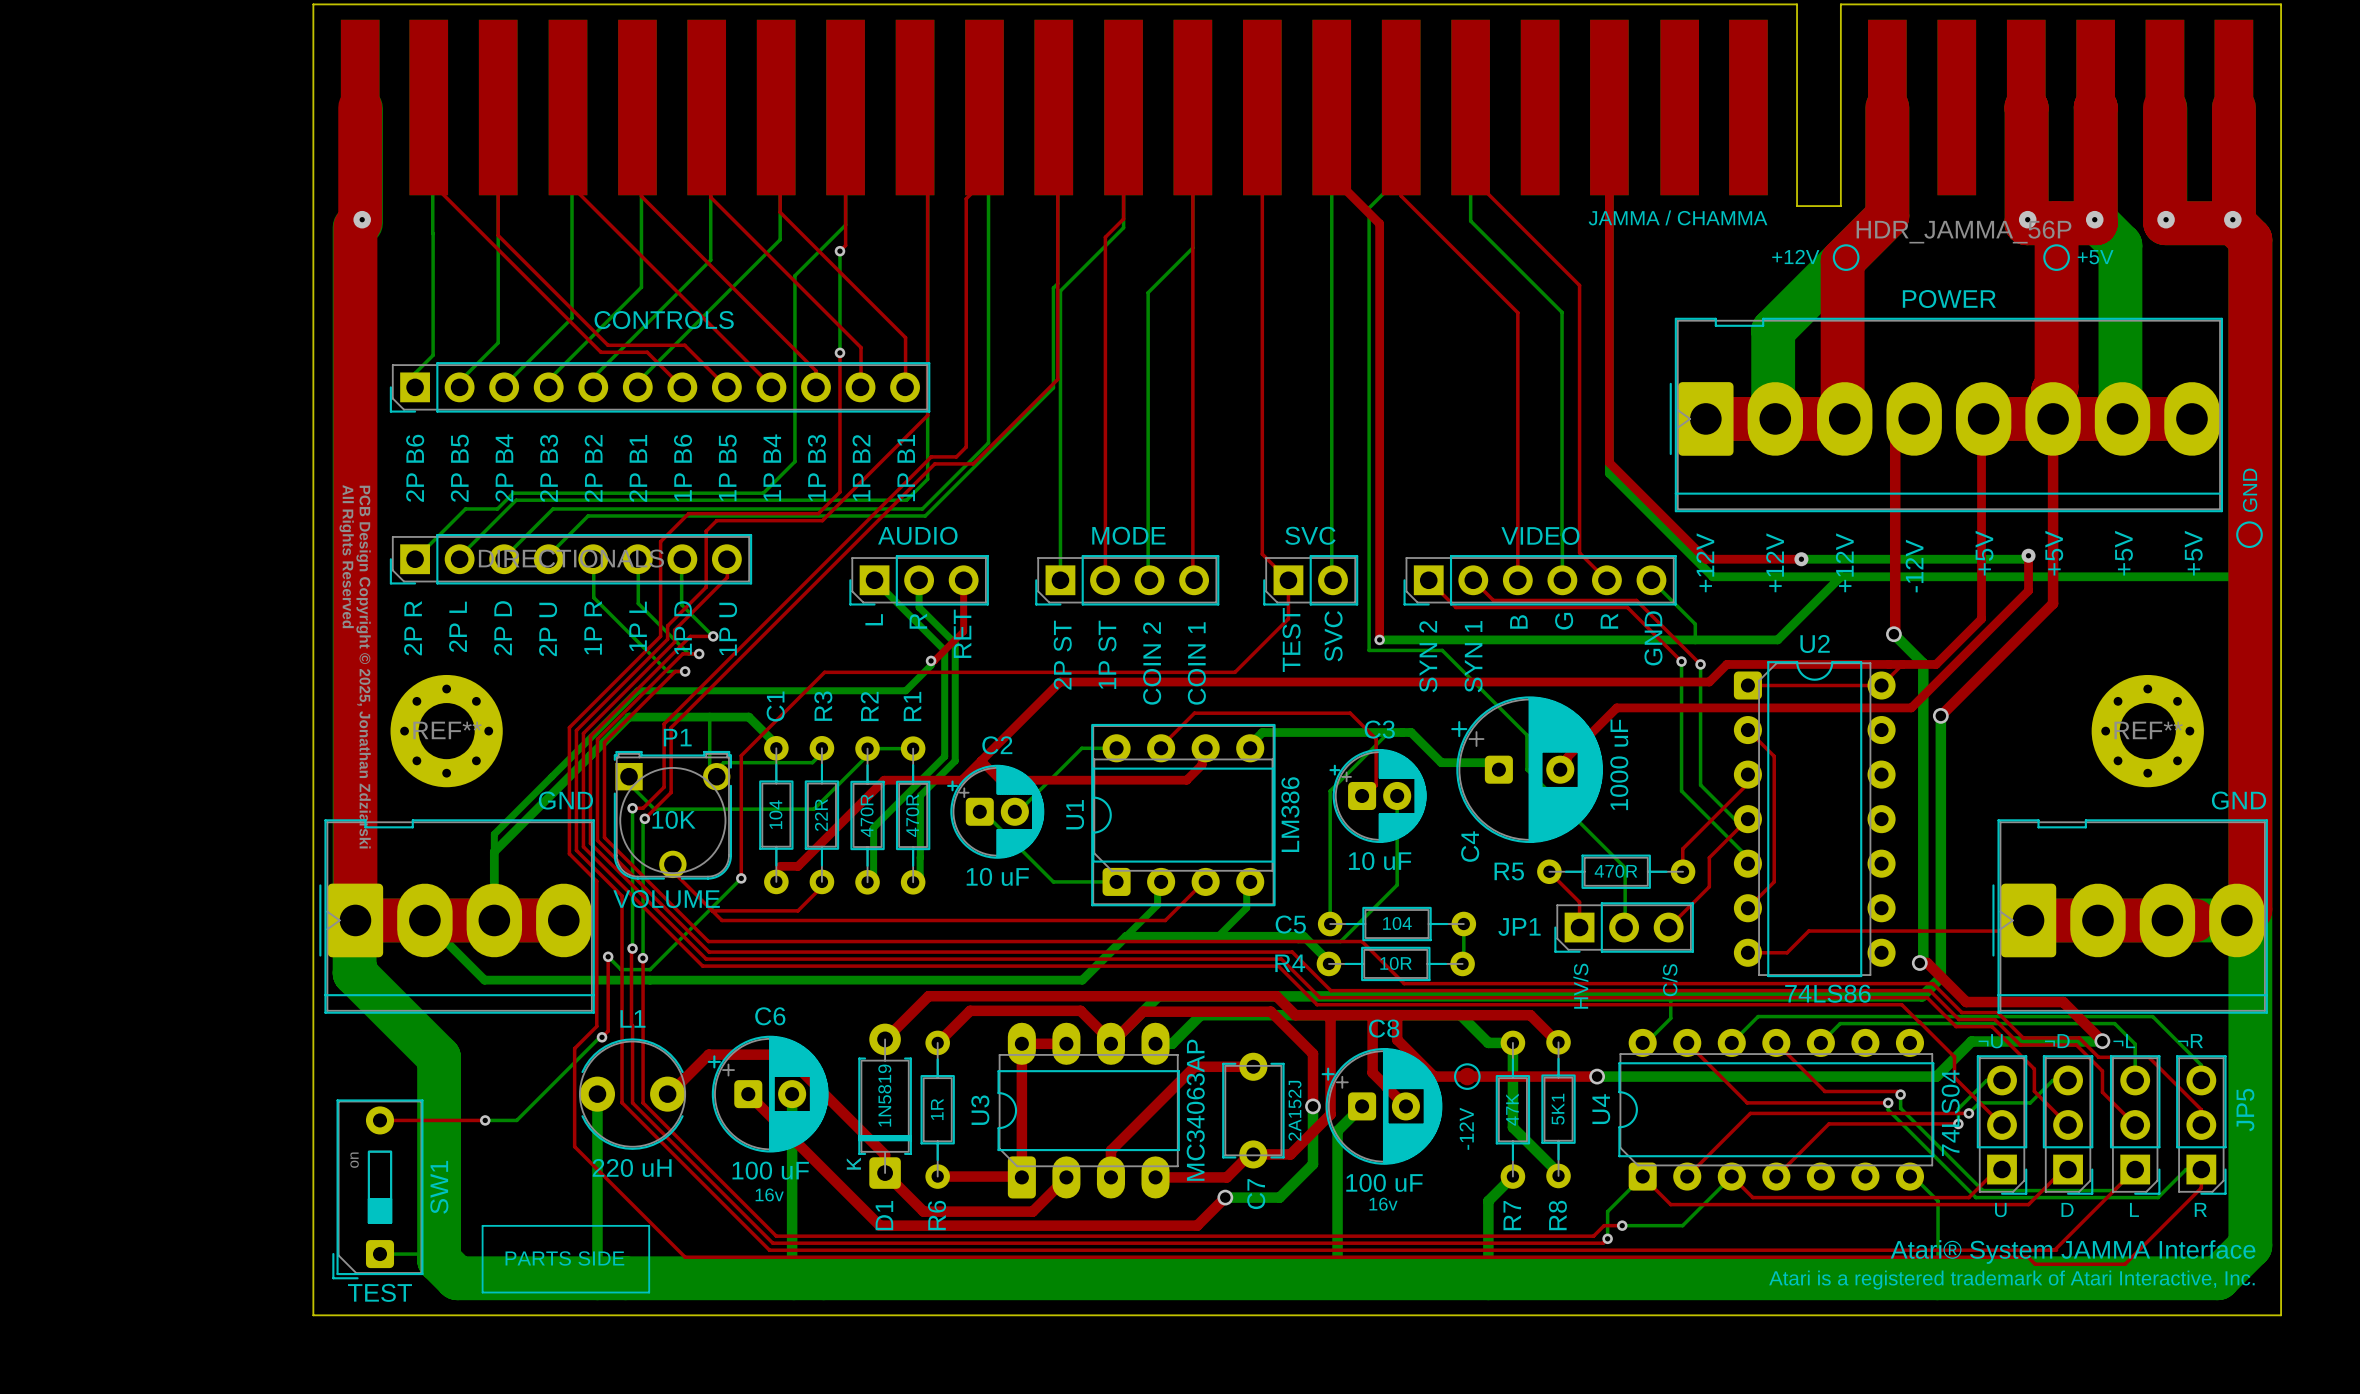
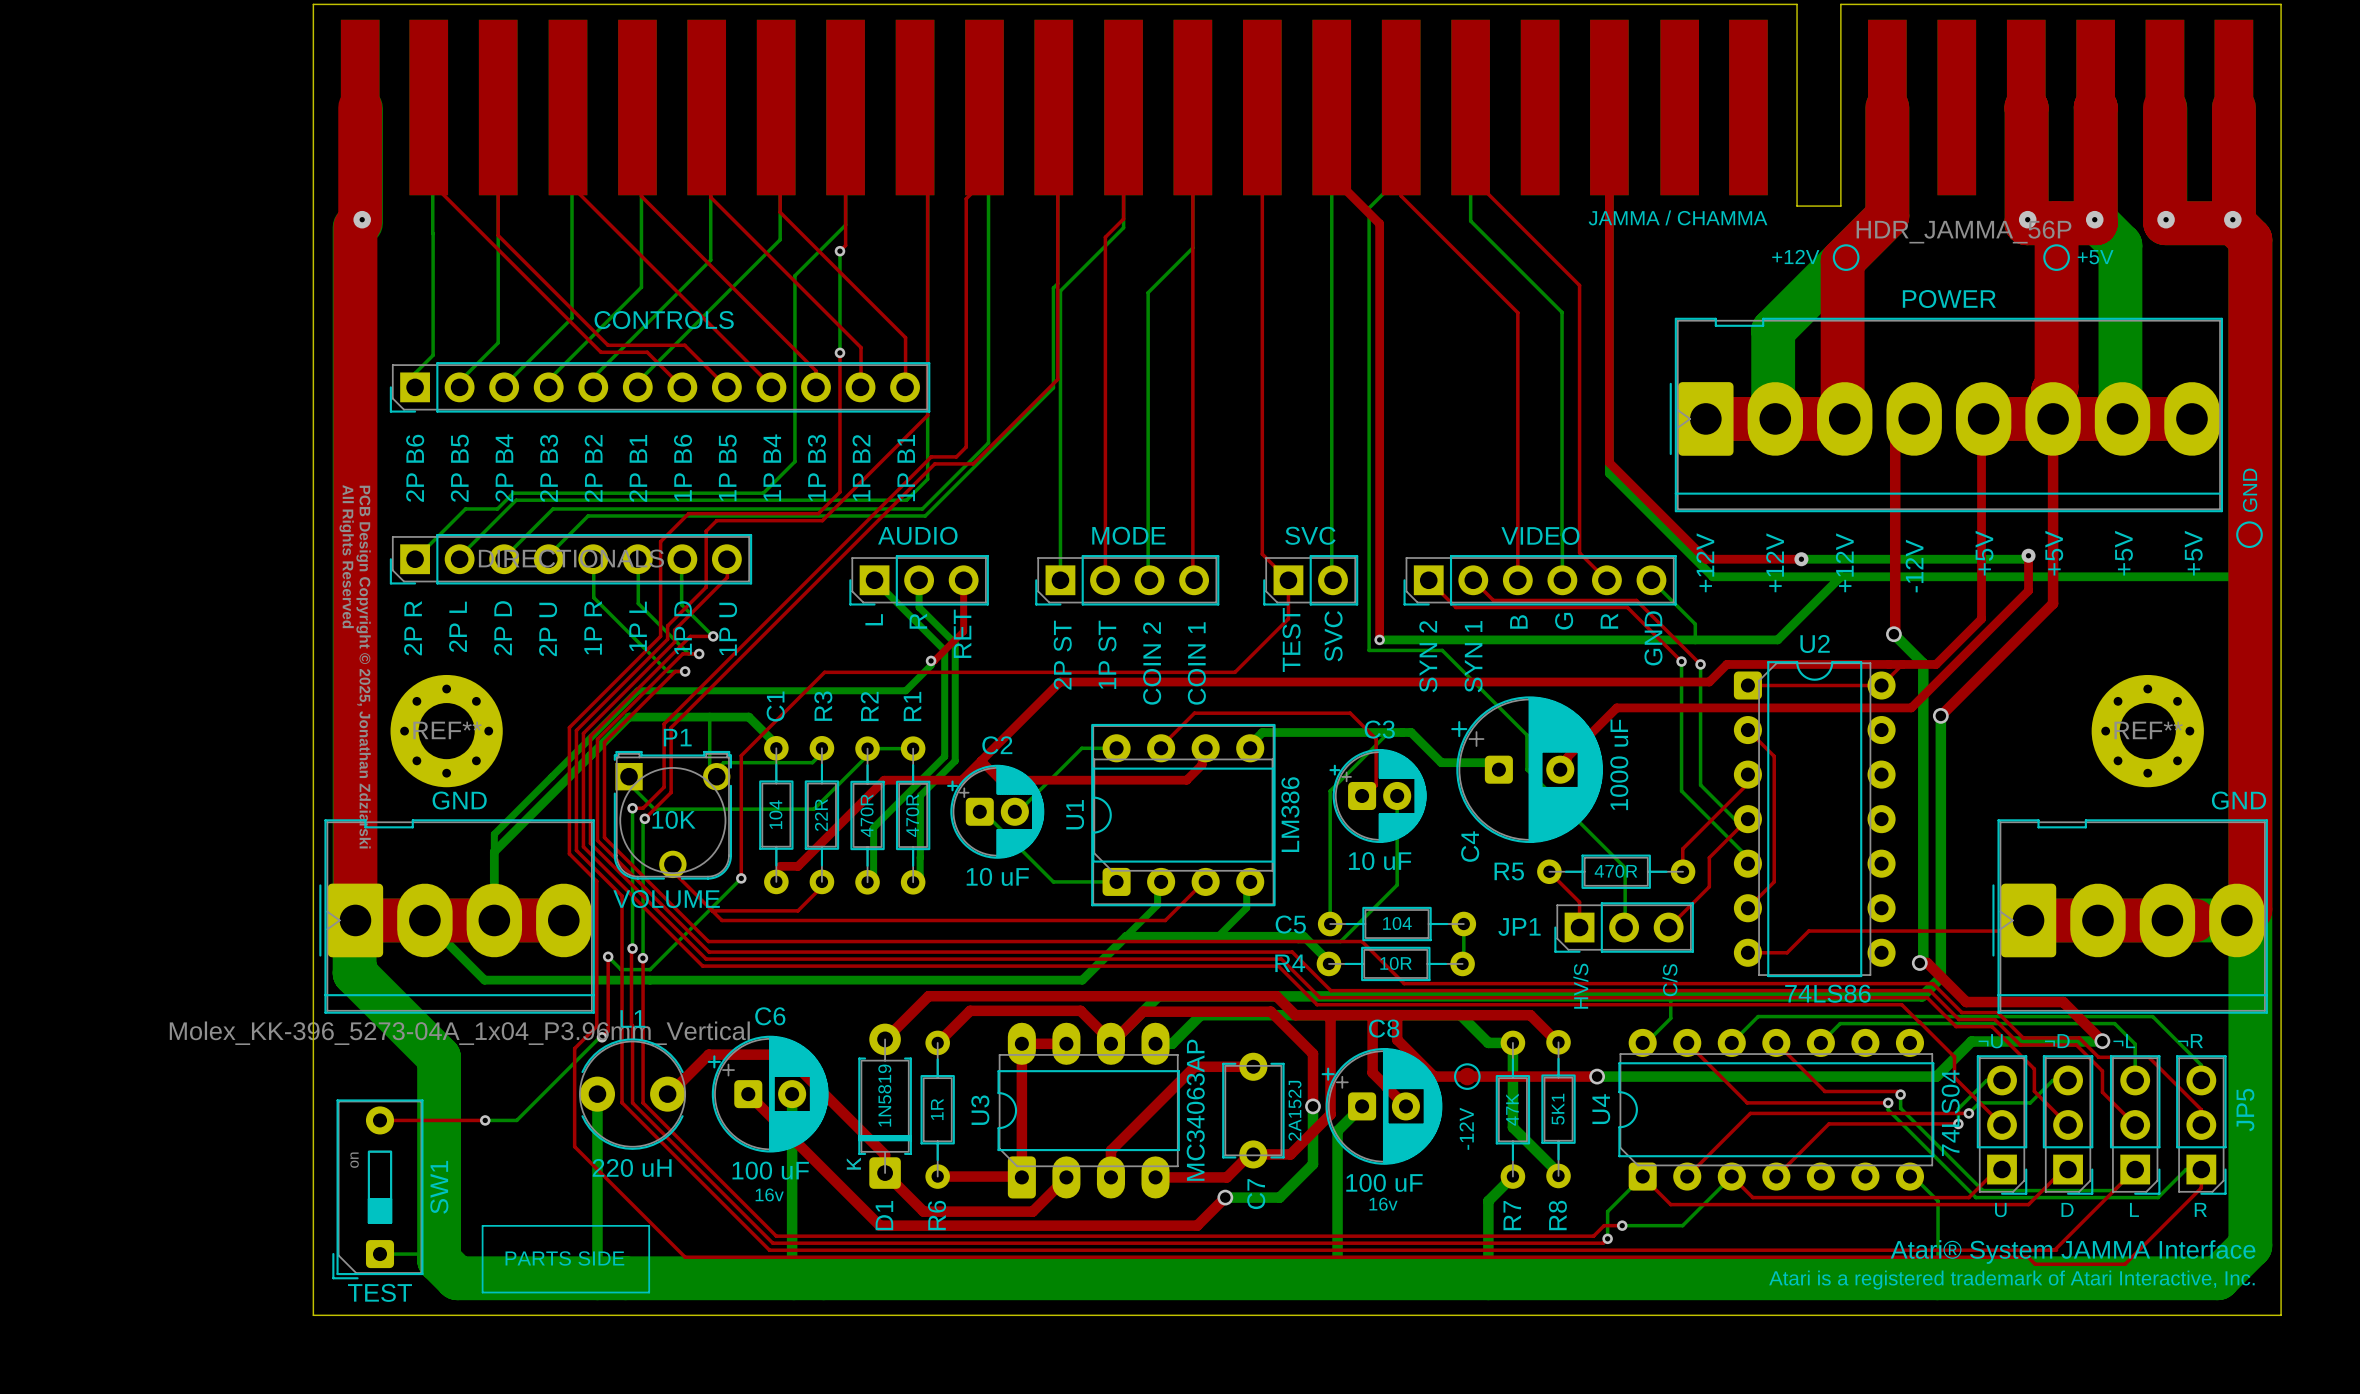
GND name position: GND (565, 800) -> GND (459, 800)
GND value: none -> Molex_KK-396_5273-04A_1x04_P3.96mm_Vertical (459, 1033)

